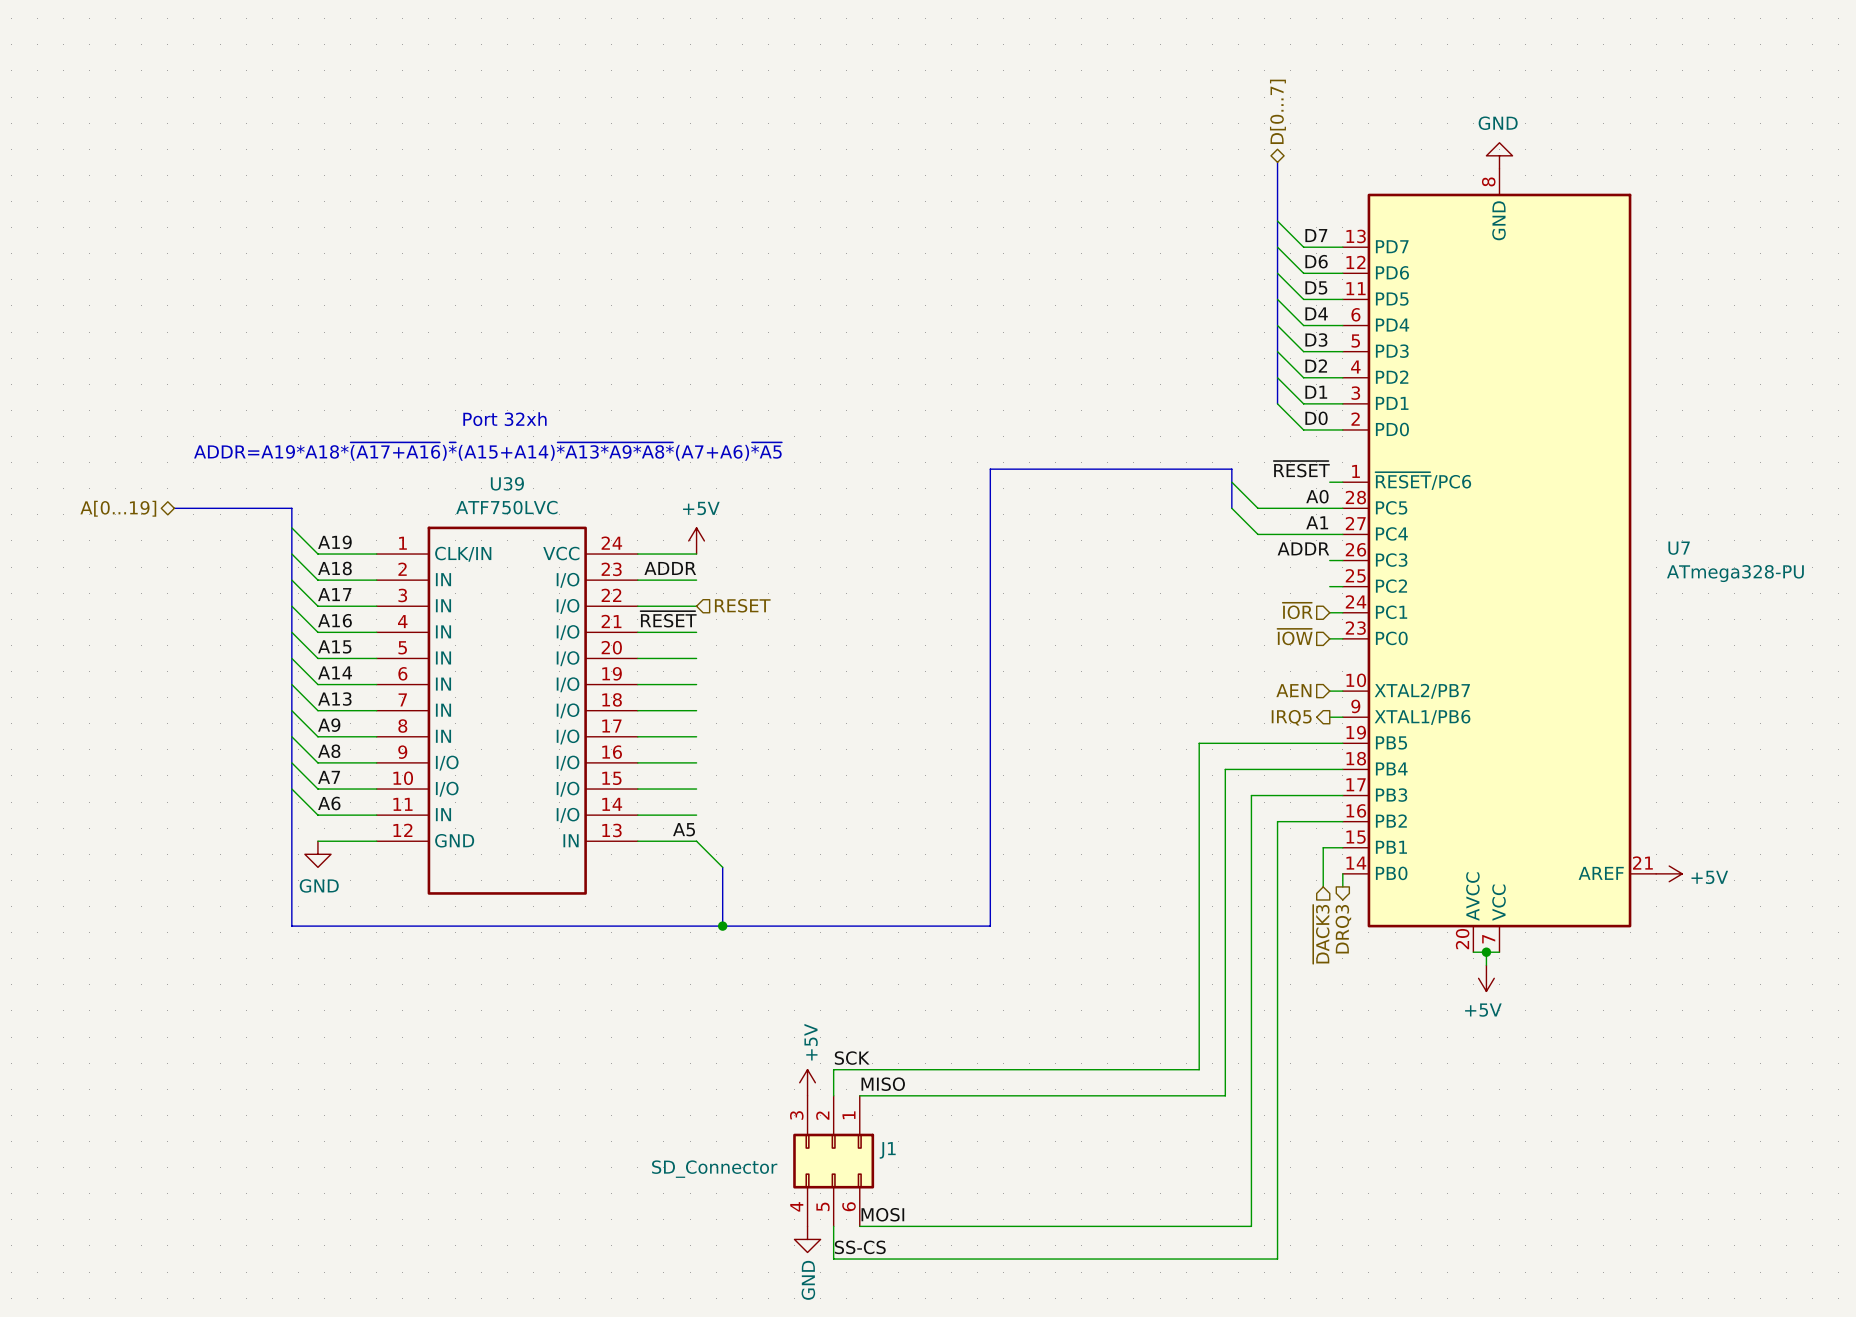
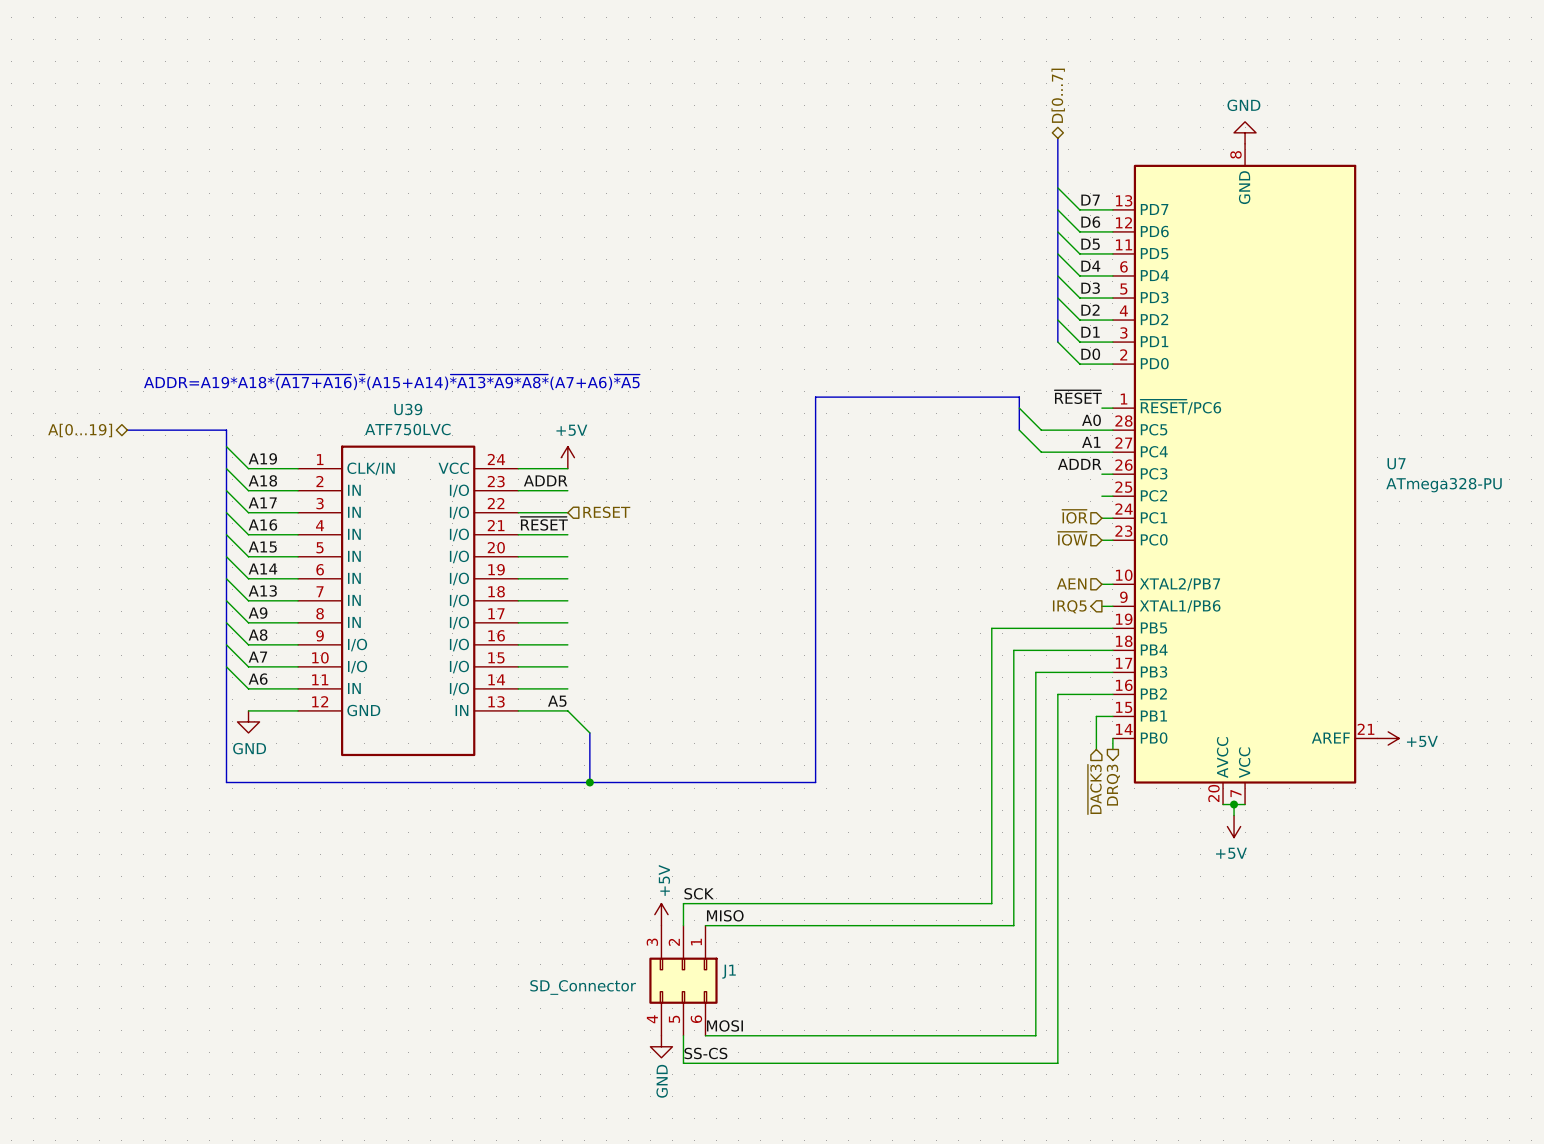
text: Port 32xh (504, 419) -> none

